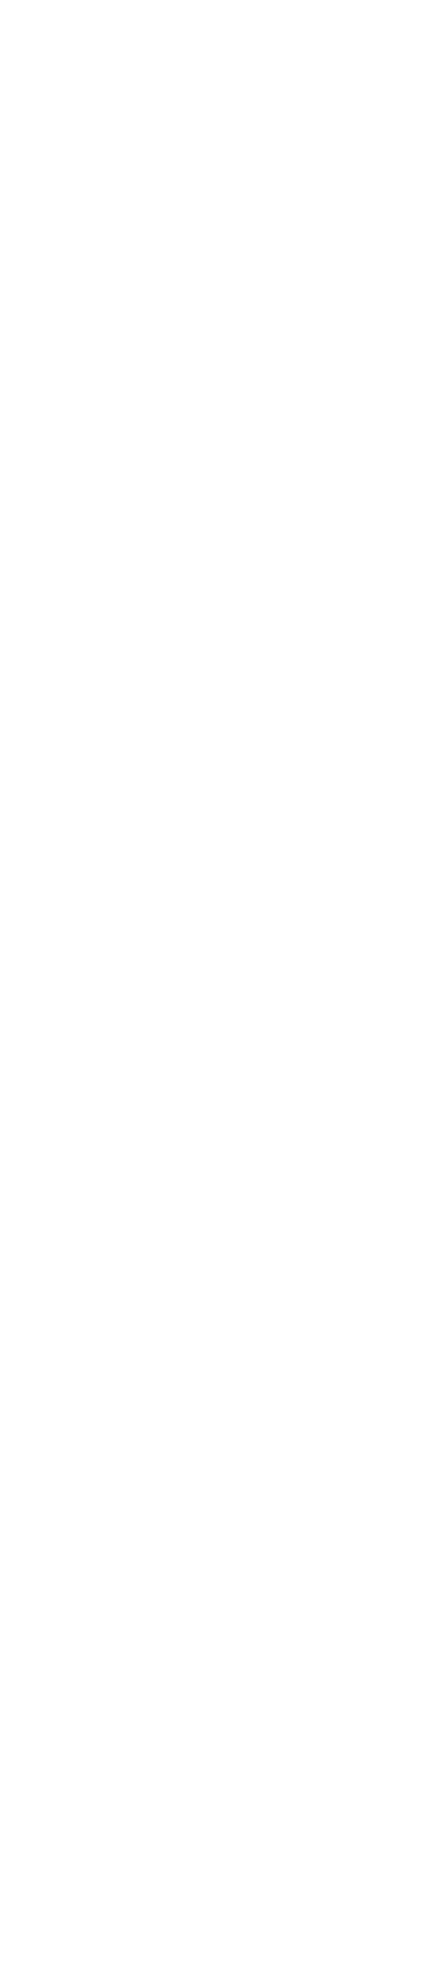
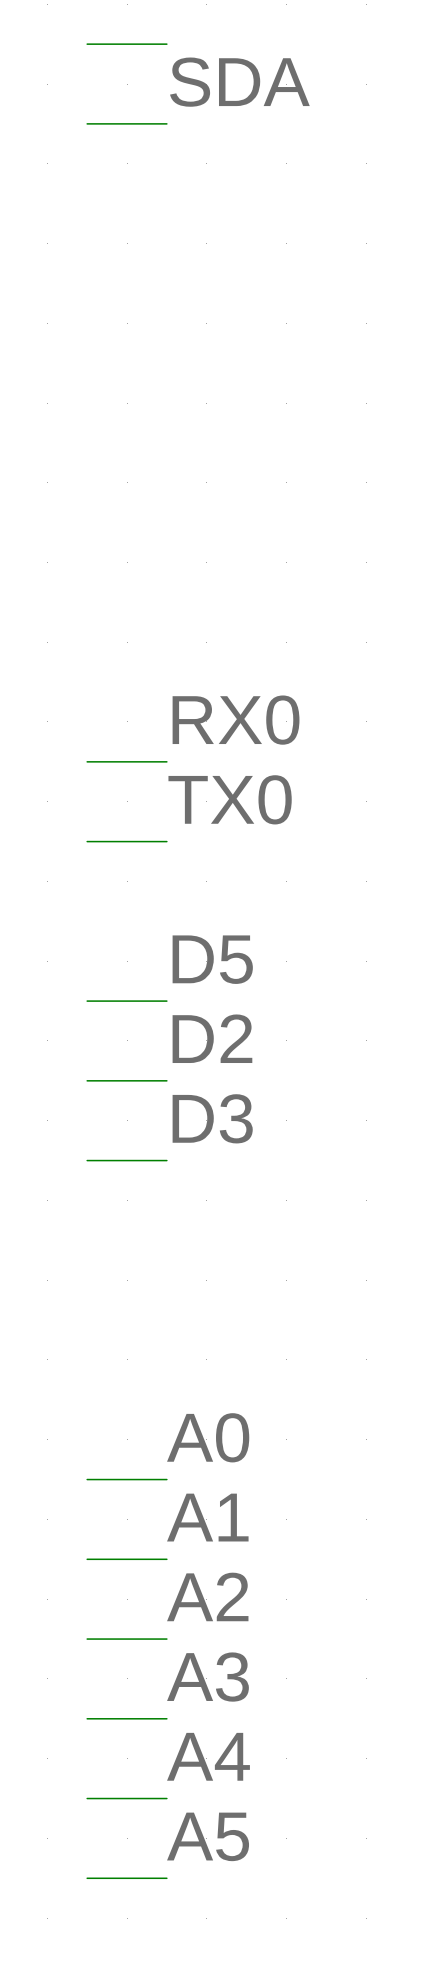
wire: none -> (87, 44) (166, 44)
label: none -> SDA (239, 82)
wire: none -> (87, 123) (166, 123)
label: none -> RX0 (236, 720)
wire: none -> (87, 761) (166, 761)
label: none -> TX0 (230, 799)
wire: none -> (87, 841) (166, 841)
label: none -> D5 (212, 959)
wire: none -> (87, 1001) (166, 1001)
label: none -> D2 (212, 1038)
wire: none -> (87, 1080) (166, 1080)
label: none -> D3 (212, 1118)
wire: none -> (87, 1160) (166, 1160)
label: none -> A0 (208, 1437)
wire: none -> (87, 1479) (166, 1479)
label: none -> A1 (207, 1517)
wire: none -> (87, 1559) (166, 1559)
label: none -> A2 (207, 1596)
wire: none -> (87, 1639) (166, 1639)
label: none -> A3 (207, 1677)
wire: none -> (87, 1718) (166, 1718)
label: none -> A4 (208, 1756)
wire: none -> (87, 1798) (166, 1798)
label: none -> A5 (208, 1836)
wire: none -> (87, 1878) (166, 1878)

